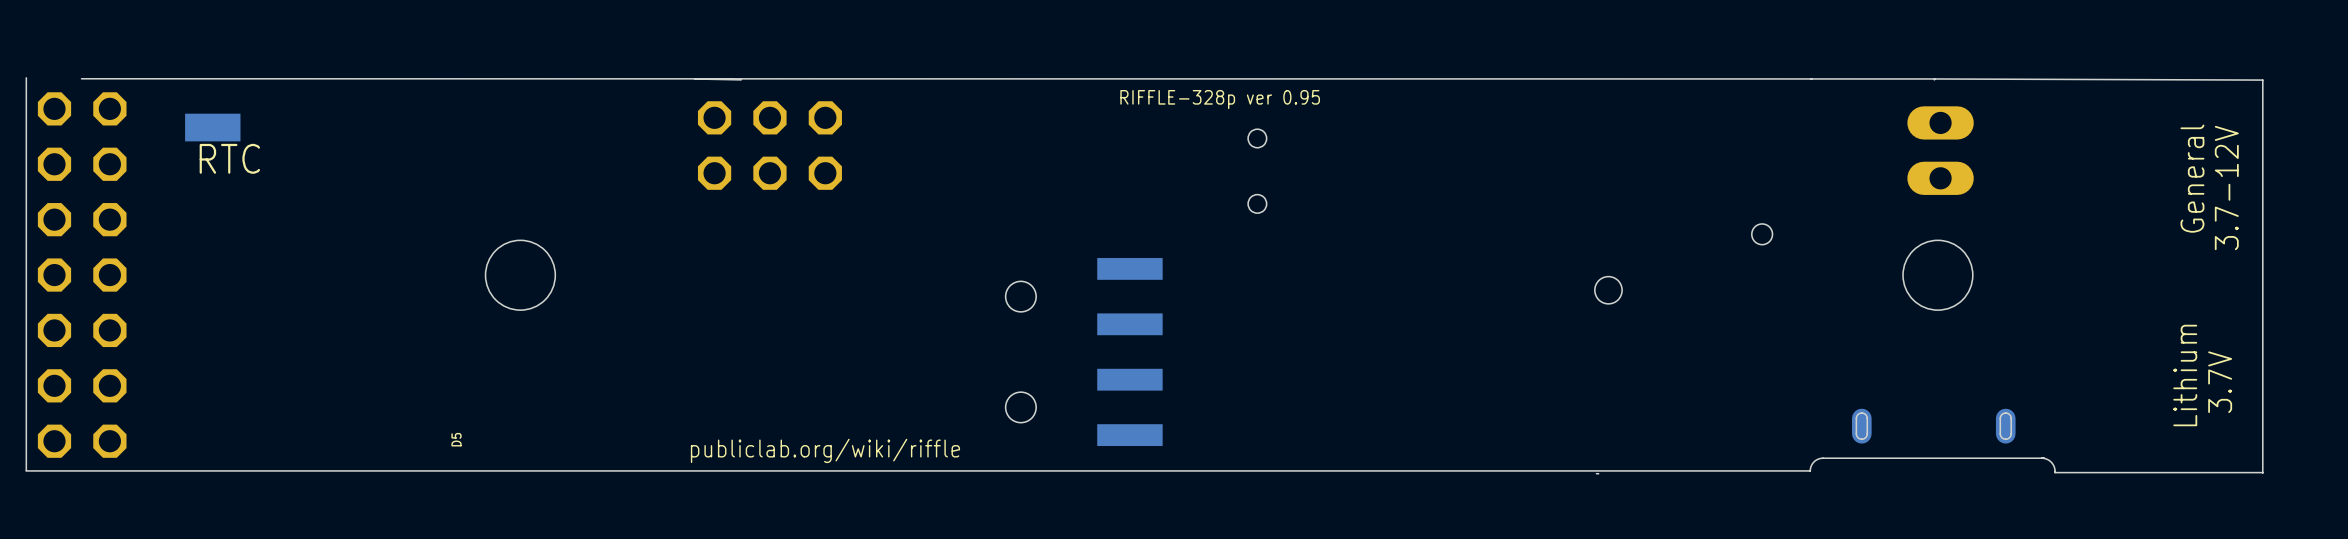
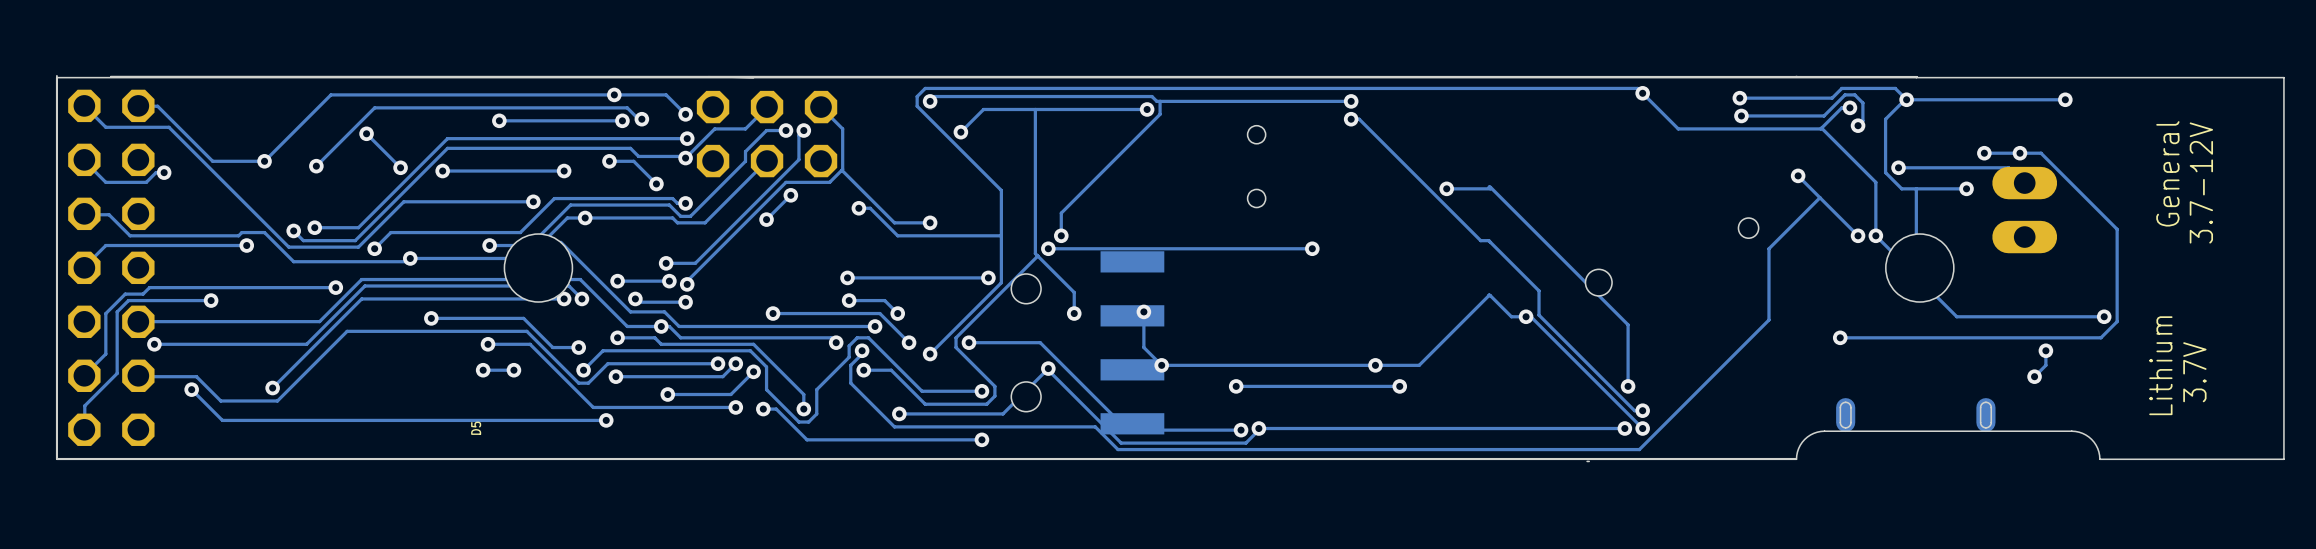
board edge: (1934, 78) (2262, 80) (2262, 473) -> none
board edge: none -> (2283, 77) (2283, 459) (2099, 459) (2097, 448) (2091, 439) (2082, 433) (2071, 431) (1820, 431) (1810, 434) (1802, 442) (1796, 459) (56, 459) (56, 77) (2283, 77)
via: none -> (1642, 93)
via: none -> (614, 94)
text: RIFFLE-328p ver 0.95 (1220, 99) -> none
track: none -> (1739, 98) (1832, 98) (1841, 88) (1895, 88) (1906, 99)
via: none -> (1739, 98)
via: none -> (1906, 99)
track: none -> (2065, 99) (1905, 99) (1885, 119) (1885, 172) (1901, 188) (1966, 188)
via: none -> (2065, 99)
via: none -> (930, 101)
track: none -> (1160, 101) (1160, 114) (1061, 213) (1061, 235)
track: none -> (1351, 101) (1156, 101) (1151, 96) (934, 96) (930, 101)
via: none -> (1351, 101)
track: none -> (84, 105) (105, 127) (168, 127) (288, 247) (358, 247) (403, 201) (533, 201)
track: none -> (138, 105) (157, 106) (212, 161) (264, 161) (330, 94) (666, 94) (685, 114)
track: none -> (767, 107) (745, 128) (714, 128) (685, 158) (685, 156) (638, 156) (630, 148) (447, 148) (355, 240) (303, 240) (293, 230)
track: none -> (821, 107) (842, 128) (842, 169) (829, 182) (785, 182) (687, 281) (687, 284)
track: none -> (1849, 107) (1841, 107) (1820, 128) (1678, 128) (1637, 88) (925, 88) (917, 96) (917, 106) (1001, 190) (1001, 282) (930, 354)
via: none -> (1849, 107)
track: none -> (1035, 109) (1035, 253) (1074, 292) (1074, 313)
track: none -> (1147, 109) (983, 109) (960, 132)
via: none -> (1147, 109)
via: none -> (685, 114)
track: none -> (1741, 115) (1824, 115) (1845, 94) (1854, 94) (1862, 103) (1862, 120) (1858, 125)
via: none -> (1741, 115)
track: none -> (641, 119) (638, 119) (627, 107) (374, 107) (316, 166)
via: none -> (641, 119)
track: none -> (1351, 119) (1359, 119) (1480, 240) (1489, 241) (1539, 290) (1539, 315) (1634, 410) (1642, 410)
via: none -> (1351, 119)
via: none -> (499, 120)
track: none -> (622, 120) (499, 120)
via: none -> (622, 120)
RTC: (212, 127) -> none
via: none -> (1858, 125)
track: none -> (1821, 128) (1875, 182) (1875, 235) (1956, 316) (2104, 316)
track: none -> (785, 130) (766, 130) (745, 151) (745, 161) (690, 216) (680, 216) (669, 205) (570, 205) (530, 245) (489, 245)
via: none -> (785, 130)
track: none -> (803, 130) (798, 135) (798, 159) (695, 263) (666, 263)
via: none -> (803, 130)
via: none -> (960, 132)
track: none -> (366, 133) (400, 167)
via: none -> (366, 133)
track: none -> (687, 138) (447, 138) (358, 227) (314, 227)
via: none -> (687, 138)
part position: (769, 145) -> (767, 134)
part position: (1940, 150) -> (2024, 210)
track: none -> (1984, 153) (2041, 153) (2117, 229) (2117, 321) (2100, 337) (1840, 337)
via: none -> (1984, 153)
via: none -> (2019, 153)
via: none -> (685, 158)
track: none -> (84, 159) (105, 182) (146, 182) (156, 172) (164, 172)
via: none -> (264, 161)
track: none -> (609, 161) (633, 161) (656, 183)
via: none -> (609, 161)
track: none -> (767, 161) (705, 222) (677, 222) (672, 217) (567, 217) (526, 258) (410, 258) (407, 261) (293, 261) (264, 232) (241, 232) (238, 235) (130, 235) (109, 214) (84, 213)
via: none -> (316, 166)
via: none -> (400, 167)
track: none -> (1898, 167) (2008, 167) (2024, 183)
via: none -> (1898, 167)
track: none -> (841, 170) (894, 222) (930, 222)
via: none -> (442, 171)
track: none -> (564, 171) (442, 171)
via: none -> (564, 171)
via: none -> (164, 172)
track: none -> (1798, 175) (1858, 235)
via: none -> (1798, 175)
via: none -> (656, 183)
track: none -> (1446, 188) (1490, 188) (1490, 187) (1628, 324) (1628, 386)
via: none -> (1446, 188)
track: none -> (1916, 188) (1916, 258)
via: none -> (1966, 188)
track: none -> (790, 195) (766, 219)
via: none -> (790, 195)
track: none -> (1819, 197) (1768, 248) (1768, 320) (1639, 449) (1117, 449) (1095, 426) (894, 426) (850, 383) (850, 365) (862, 354) (862, 350)
via: none -> (533, 201)
track: none -> (685, 203) (677, 203) (672, 198) (554, 198) (520, 232) (390, 232) (374, 248)
via: none -> (685, 203)
track: none -> (858, 208) (870, 208) (897, 235) (1001, 235)
via: none -> (858, 208)
via: none -> (585, 217)
via: none -> (766, 219)
via: none -> (930, 222)
via: none -> (314, 227)
via: none -> (293, 230)
via: none -> (1061, 235)
via: none -> (1858, 235)
via: none -> (1875, 235)
track: none -> (560, 242) (630, 311) (664, 311) (679, 326) (875, 326)
track: none -> (246, 245) (105, 245) (84, 267)
via: none -> (246, 245)
via: none -> (489, 245)
via: none -> (374, 248)
via: none -> (1048, 248)
track: none -> (1312, 248) (1048, 248)
via: none -> (1312, 248)
track: none -> (1037, 256) (956, 337) (956, 347) (994, 386) (994, 396) (986, 404) (925, 404) (891, 370) (863, 370)
via: none -> (410, 258)
via: none -> (666, 263)
via: none -> (847, 277)
track: none -> (988, 277) (847, 277)
via: none -> (988, 277)
via: none -> (617, 281)
track: none -> (669, 281) (617, 281)
via: none -> (669, 281)
via: none -> (687, 284)
track: none -> (335, 287) (149, 287) (143, 294) (125, 294) (105, 313) (105, 354) (84, 375)
via: none -> (335, 287)
track: none -> (564, 298) (361, 298) (272, 388)
via: none -> (564, 298)
track: none -> (581, 298) (568, 286) (364, 286) (306, 344) (154, 344)
via: none -> (581, 298)
track: none -> (635, 298) (638, 302) (685, 302)
via: none -> (635, 298)
track: none -> (211, 300) (128, 300) (117, 311) (117, 373) (84, 405) (84, 429)
via: none -> (211, 300)
track: none -> (849, 300) (884, 300) (897, 313)
via: none -> (849, 300)
via: none -> (685, 302)
track: none -> (1143, 311) (1143, 347) (1161, 365) (1419, 365) (1489, 295) (1511, 316) (1530, 316) (1642, 428)
via: none -> (1143, 311)
track: none -> (773, 313) (879, 313) (909, 342)
via: none -> (773, 313)
via: none -> (897, 313)
via: none -> (1074, 313)
via: none -> (1526, 316)
via: none -> (2104, 316)
track: none -> (431, 318) (523, 318) (552, 347) (578, 347)
via: none -> (431, 318)
track: none -> (138, 321) (319, 321) (361, 279) (580, 279) (627, 326) (669, 326) (680, 337) (831, 337) (836, 342)
via: none -> (661, 326)
via: none -> (875, 326)
track: none -> (617, 337) (654, 337) (661, 344) (753, 344) (803, 394) (803, 409)
via: none -> (617, 337)
via: none -> (1840, 337)
via: none -> (836, 342)
via: none -> (909, 342)
track: none -> (968, 342) (1040, 342) (1127, 430) (1241, 430)
via: none -> (968, 342)
via: none -> (154, 344)
track: none -> (488, 344) (530, 344) (593, 407) (735, 407)
via: none -> (488, 344)
via: none -> (578, 347)
via: none -> (862, 350)
track: none -> (2045, 350) (2045, 365) (2034, 376)
via: none -> (2045, 350)
via: none -> (930, 354)
track: none -> (717, 363) (607, 363) (588, 383) (578, 383) (526, 331) (347, 331) (277, 400) (220, 400) (196, 376) (138, 375)
via: none -> (717, 363)
track: none -> (735, 363) (722, 376) (615, 376)
via: none -> (735, 363)
via: none -> (1161, 365)
via: none -> (1375, 365)
via: none -> (1048, 368)
via: none -> (483, 370)
track: none -> (513, 370) (483, 370)
via: none -> (513, 370)
track: none -> (583, 370) (603, 350) (750, 350) (766, 366) (766, 389) (798, 422) (808, 422) (816, 413) (816, 389) (849, 357) (849, 345) (857, 337) (868, 337) (922, 391) (981, 391)
via: none -> (583, 370)
via: none -> (863, 370)
track: none -> (753, 371) (730, 394) (667, 394)
via: none -> (753, 371)
via: none -> (615, 376)
via: none -> (2034, 376)
via: none -> (1236, 386)
track: none -> (1399, 386) (1236, 386)
via: none -> (1399, 386)
via: none -> (1628, 386)
via: none -> (272, 388)
track: none -> (191, 389) (222, 420) (606, 420)
via: none -> (191, 389)
via: none -> (981, 391)
via: none -> (667, 394)
via: none -> (735, 407)
track: none -> (763, 409) (776, 409) (807, 439) (981, 439)
via: none -> (763, 409)
via: none -> (803, 409)
via: none -> (1642, 410)
track: none -> (899, 413) (1002, 413) (1048, 368) (1121, 443) (1245, 443) (1260, 428) (1624, 428)
via: none -> (899, 413)
via: none -> (606, 420)
via: none -> (1258, 428)
via: none -> (1624, 428)
via: none -> (1642, 428)
via: none -> (1241, 430)
text: publiclab.org/wiki/riffle (825, 450) -> none
via: none -> (981, 439)
board edge: (2041, 458) (2051, 462) (2055, 472) (2262, 472) -> none
board edge: (2044, 458) (1822, 458) (1813, 461) (1810, 470) -> none

